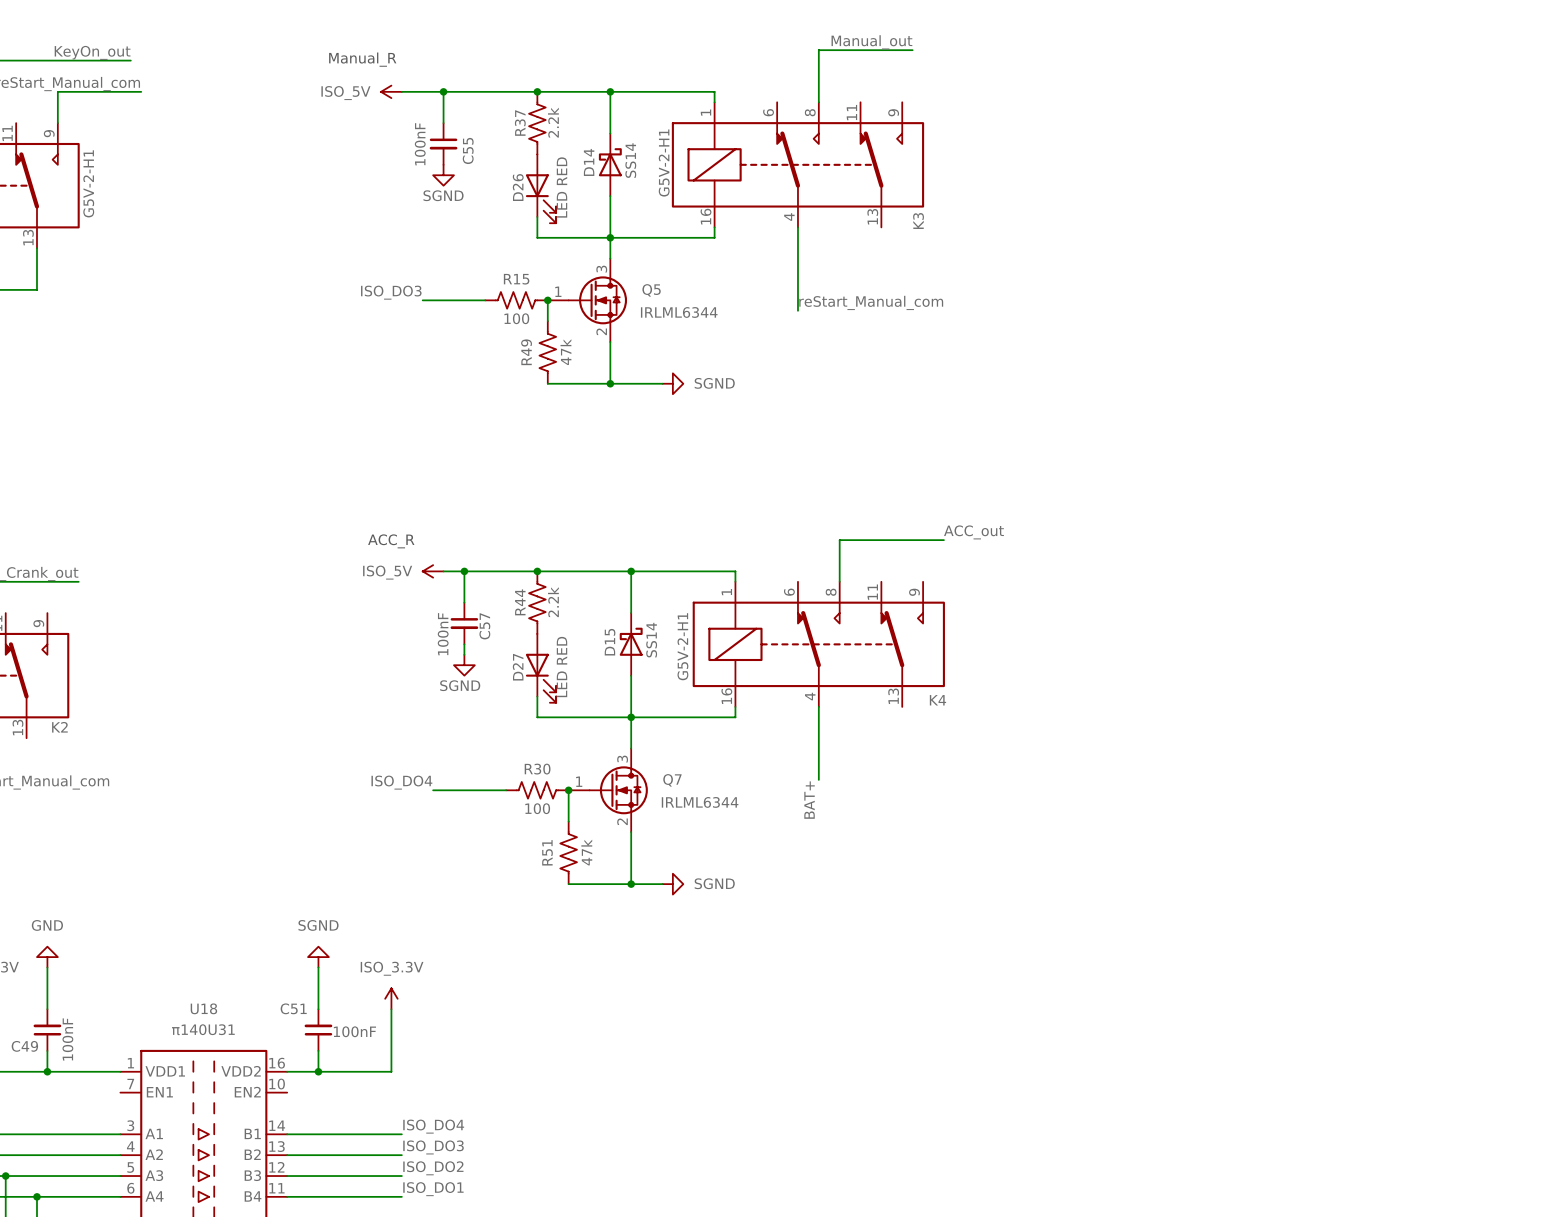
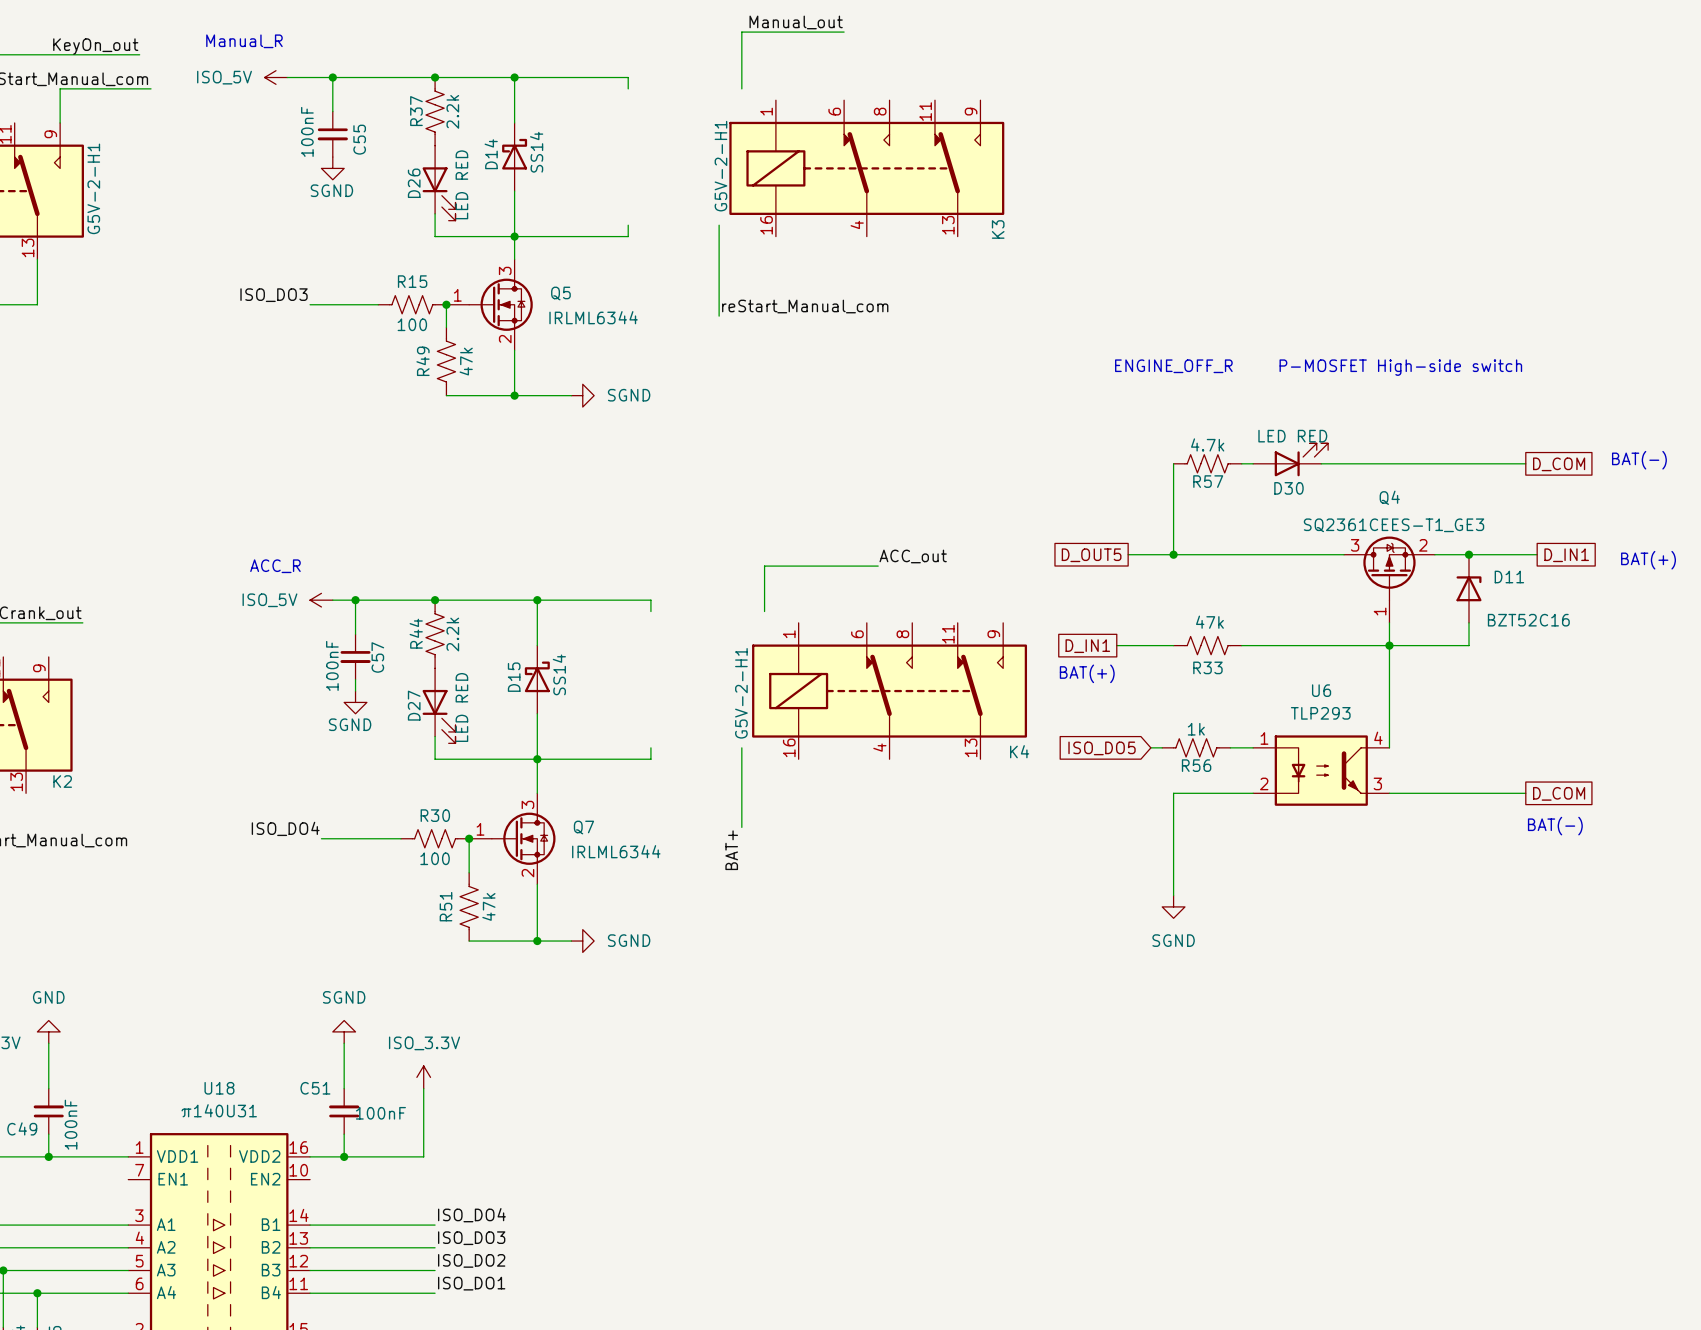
label position: Manual_out (871, 42) -> Manual_out (796, 22)
wire: (912, 50) (818, 50) (818, 102) -> (844, 32) (741, 32) (741, 88)
text position: Manual_R (362, 59) -> Manual_R (244, 41)
junction: none -> (332, 77)
junction: none -> (435, 77)
junction: none -> (514, 77)
power symbol position: ISO_5V (391, 91) -> ISO_5V (276, 77)
wire: (401, 91) (714, 91) (714, 102) -> (287, 77) (628, 77) (628, 88)
wire: (443, 91) (443, 123) -> (332, 77) (332, 111)
junction: (443, 91) -> none
junction: (537, 91) -> none
wire: (610, 91) (610, 133) -> (514, 77) (514, 122)
junction: (610, 91) -> none
R37 position: (537, 123) -> (435, 111)
C55 position: (443, 143) -> (332, 134)
power symbol: none -> SGND (332, 168)
D14 position: (610, 164) -> (514, 157)
power symbol: SGND (443, 175) -> none
D26 position: (541, 188) -> (439, 183)
wire: (610, 196) (610, 258) -> (514, 191) (514, 259)
wire: (537, 216) (537, 237) (714, 237) (714, 227) -> (435, 213) (435, 236) (628, 236) (628, 225)
junction: none -> (514, 236)
wire: (797, 227) (797, 310) -> (719, 225) (719, 316)
junction: (610, 237) -> none
junction: none -> (446, 304)
label position: ISO_DO3 (391, 292) -> ISO_DO3 (274, 295)
wire: (422, 300) (485, 300) -> (310, 304) (378, 304)
R15 position: (516, 300) -> (412, 304)
wire: (547, 300) (547, 321) -> (446, 304) (446, 327)
junction: (547, 300) -> none
Q5 position: (587, 300) -> (489, 304)
label position: reStart_Manual_com (871, 302) -> reStart_Manual_com (805, 306)
wire: (610, 342) (610, 383) -> (514, 350) (514, 395)
text: none -> ENGINE_OFF_R (1173, 366)
text: none -> P-MOSFET High-side switch (1400, 367)
R49 position: (547, 352) -> (446, 361)
junction: none -> (514, 395)
power symbol: none -> SGND (582, 395)
wire: (547, 383) (662, 383) -> (446, 395) (571, 395)
junction: (610, 383) -> none
power symbol: SGND (672, 383) -> none
D30: none -> LED RED (1290, 459)
text: none -> BAT(-) (1639, 460)
wire: none -> (1173, 463) (1173, 554)
R57: none -> 4.7k (1207, 463)
wire: none -> (1241, 463) (1253, 463)
wire: none -> (1321, 463) (1525, 463)
global label: none -> D_COM (1559, 464)
wire: none -> (1128, 554) (1344, 554)
junction: none -> (1173, 554)
wire: none -> (1434, 554) (1537, 554)
junction: none -> (1469, 554)
global label: none -> D_OUT5 (1091, 555)
global label: none -> D_IN1 (1566, 555)
text: none -> BAT(+) (1648, 560)
label position: ACC_out (973, 532) -> ACC_out (913, 556)
wire: (943, 540) (839, 540) (839, 581) -> (878, 566) (764, 566) (764, 611)
text position: ACC_R (391, 541) -> ACC_R (275, 566)
Q4: none -> SQ2361CEES-T1_GE3 (1389, 579)
D11: none -> BZT52C16 (1469, 588)
junction: none -> (355, 600)
junction: none -> (435, 600)
junction: none -> (537, 600)
power symbol position: ISO_5V (433, 571) -> ISO_5V (321, 600)
wire: (443, 571) (735, 571) (735, 581) -> (332, 600) (650, 600) (650, 611)
wire: (464, 571) (464, 602) -> (355, 600) (355, 634)
junction: (464, 571) -> none
junction: (537, 571) -> none
wire: (631, 571) (631, 613) -> (537, 600) (537, 645)
junction: (631, 571) -> none
wire: none -> (1389, 622) (1389, 747)
wire: none -> (1469, 622) (1469, 645) (1241, 645)
R44 position: (537, 602) -> (435, 634)
wire: none -> (1116, 645) (1173, 645)
R33: none -> 47k (1207, 645)
junction: none -> (1389, 645)
global label: none -> D_IN1 (1087, 646)
C57 position: (464, 623) -> (355, 656)
text: none -> BAT(+) (1087, 673)
wire: (464, 644) (464, 654) -> (355, 679) (355, 691)
D15 position: (631, 644) -> (537, 679)
power symbol: none -> SGND (355, 702)
power symbol: SGND (464, 665) -> none
D27 position: (541, 668) -> (439, 705)
wire: (631, 675) (631, 748) -> (537, 713) (537, 793)
wire: (537, 696) (537, 717) (735, 717) (735, 706) -> (435, 736) (435, 759) (650, 759) (650, 747)
wire: none -> (1150, 747) (1162, 747)
R56: none -> 1k (1196, 747)
wire: none -> (1230, 747) (1253, 747)
global label: none -> ISO_DO5 (1102, 748)
junction: none -> (537, 759)
wire: (818, 706) (818, 779) -> (741, 747) (741, 827)
junction: (631, 717) -> none
U6: none -> TLP293 (1321, 770)
wire: none -> (1253, 793) (1173, 793) (1173, 895)
wire: none -> (1389, 793) (1525, 793)
global label: none -> D_COM (1559, 793)
text: none -> BAT(-) (1555, 826)
junction: none -> (469, 838)
label position: ISO_DO4 (401, 782) -> ISO_DO4 (285, 828)
wire: (433, 790) (506, 790) -> (321, 838) (400, 838)
R30 position: (537, 790) -> (435, 838)
wire: (568, 790) (568, 821) -> (469, 838) (469, 872)
junction: (568, 790) -> none
Q7 position: (608, 790) -> (512, 838)
label position: BAT+ (809, 800) -> BAT+ (731, 850)
wire: (631, 832) (631, 884) -> (537, 884) (537, 941)
power symbol: none -> SGND (1173, 906)
R51 position: (568, 852) -> (469, 906)
junction: none -> (537, 941)
power symbol: none -> SGND (582, 941)
wire: (568, 884) (662, 884) -> (469, 941) (571, 941)
junction: (631, 884) -> none
power symbol: SGND (672, 884) -> none

